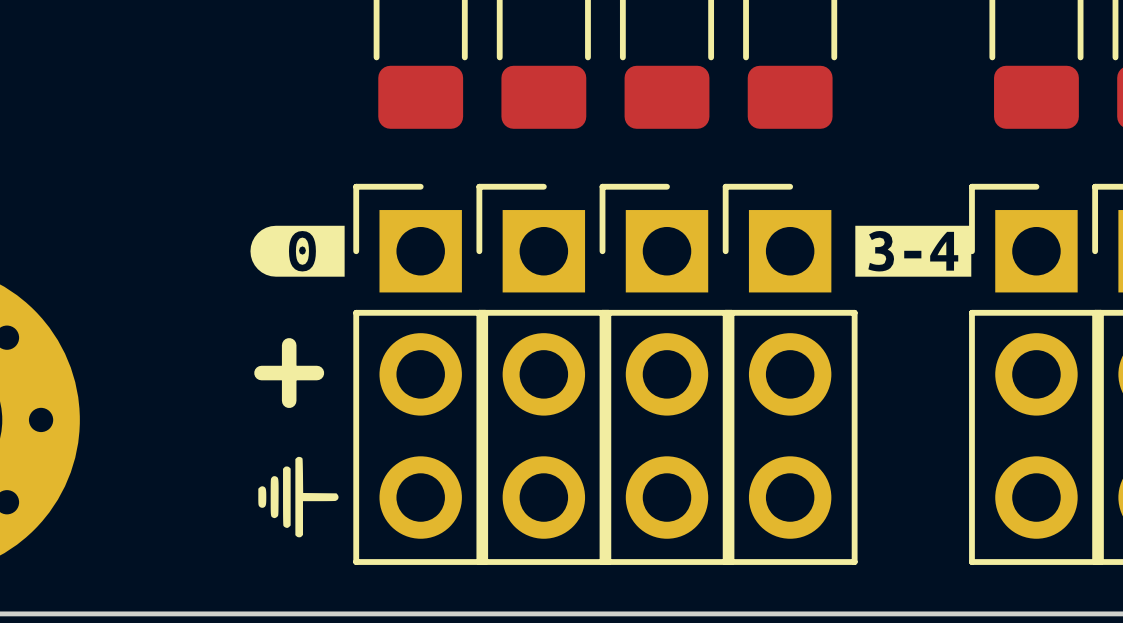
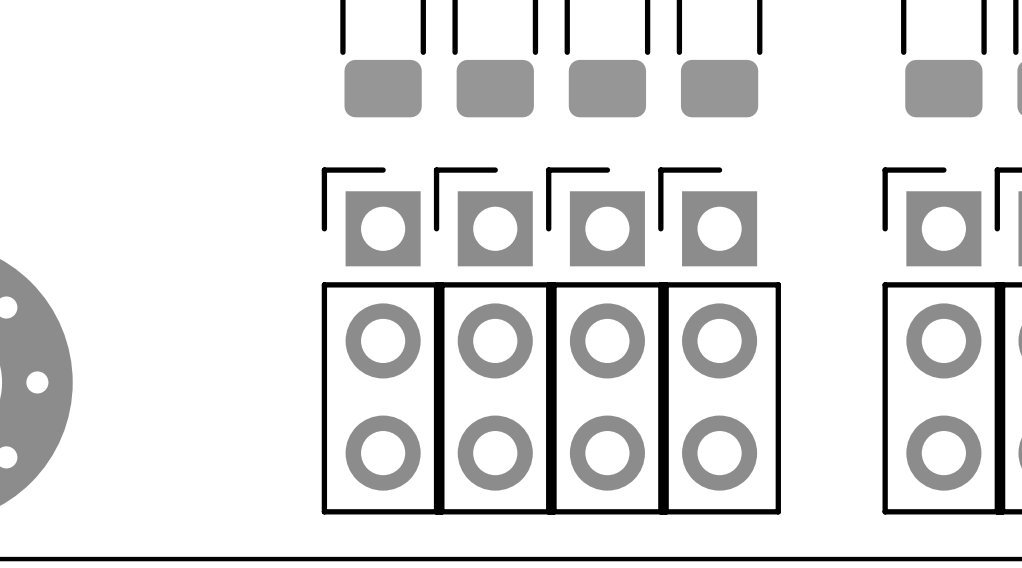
drawing: [250, 225, 345, 277] -> none
drawing: [855, 225, 972, 277] -> none
text: + (289, 373) -> none
drawing: [258, 456, 339, 538] -> none

